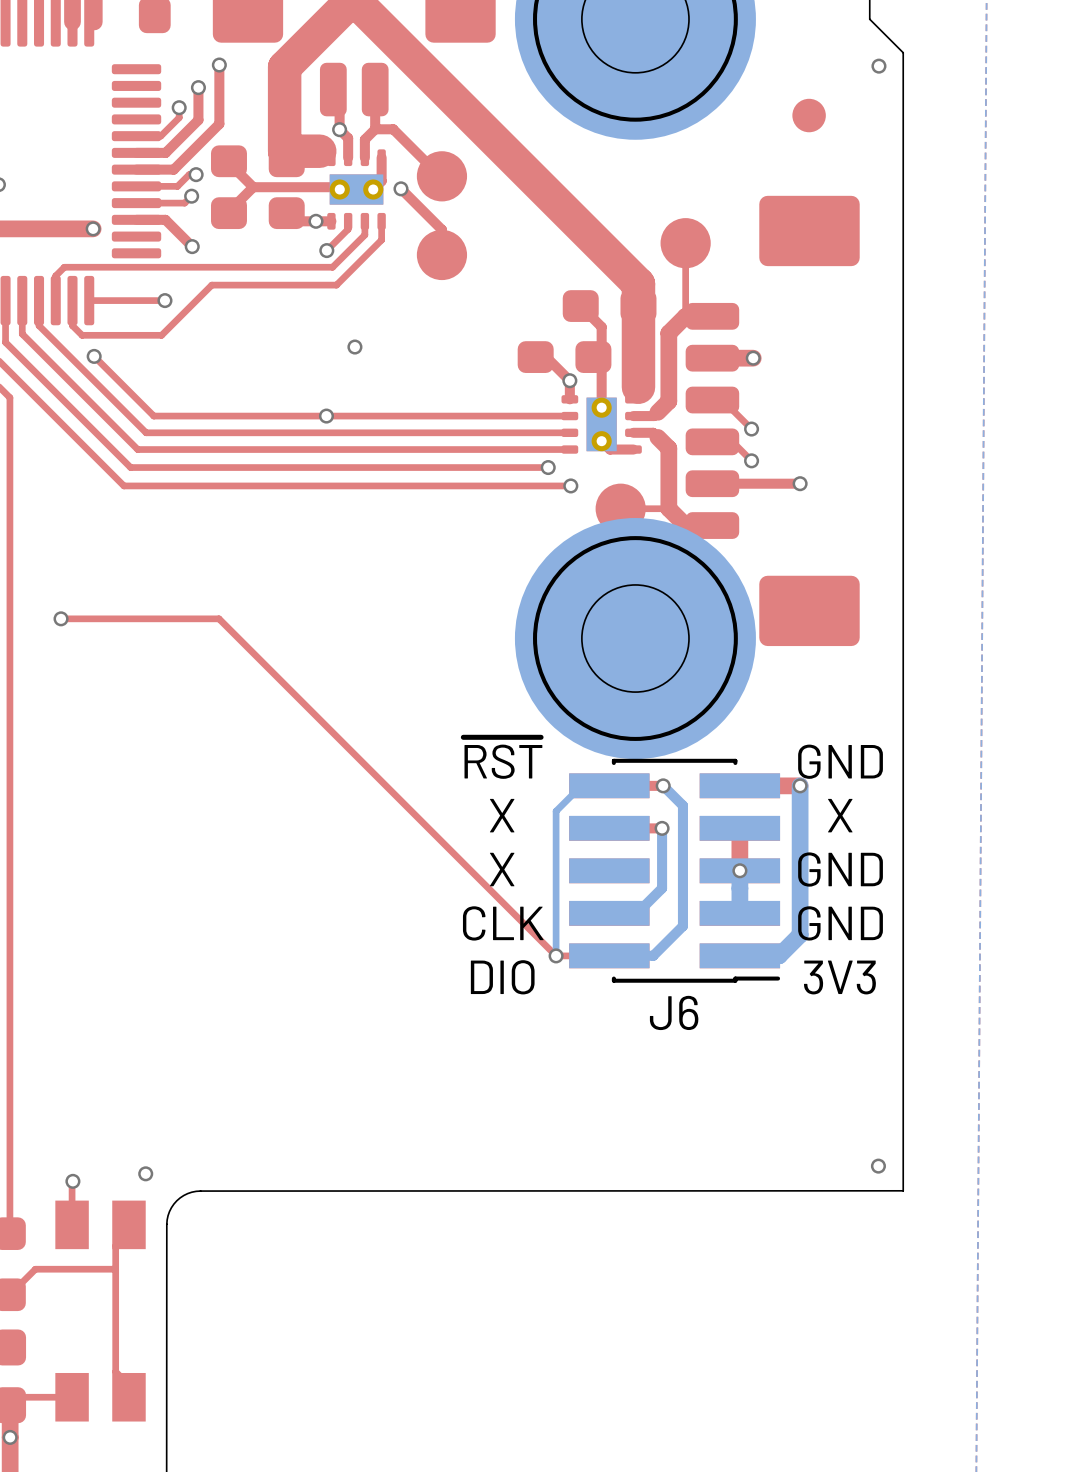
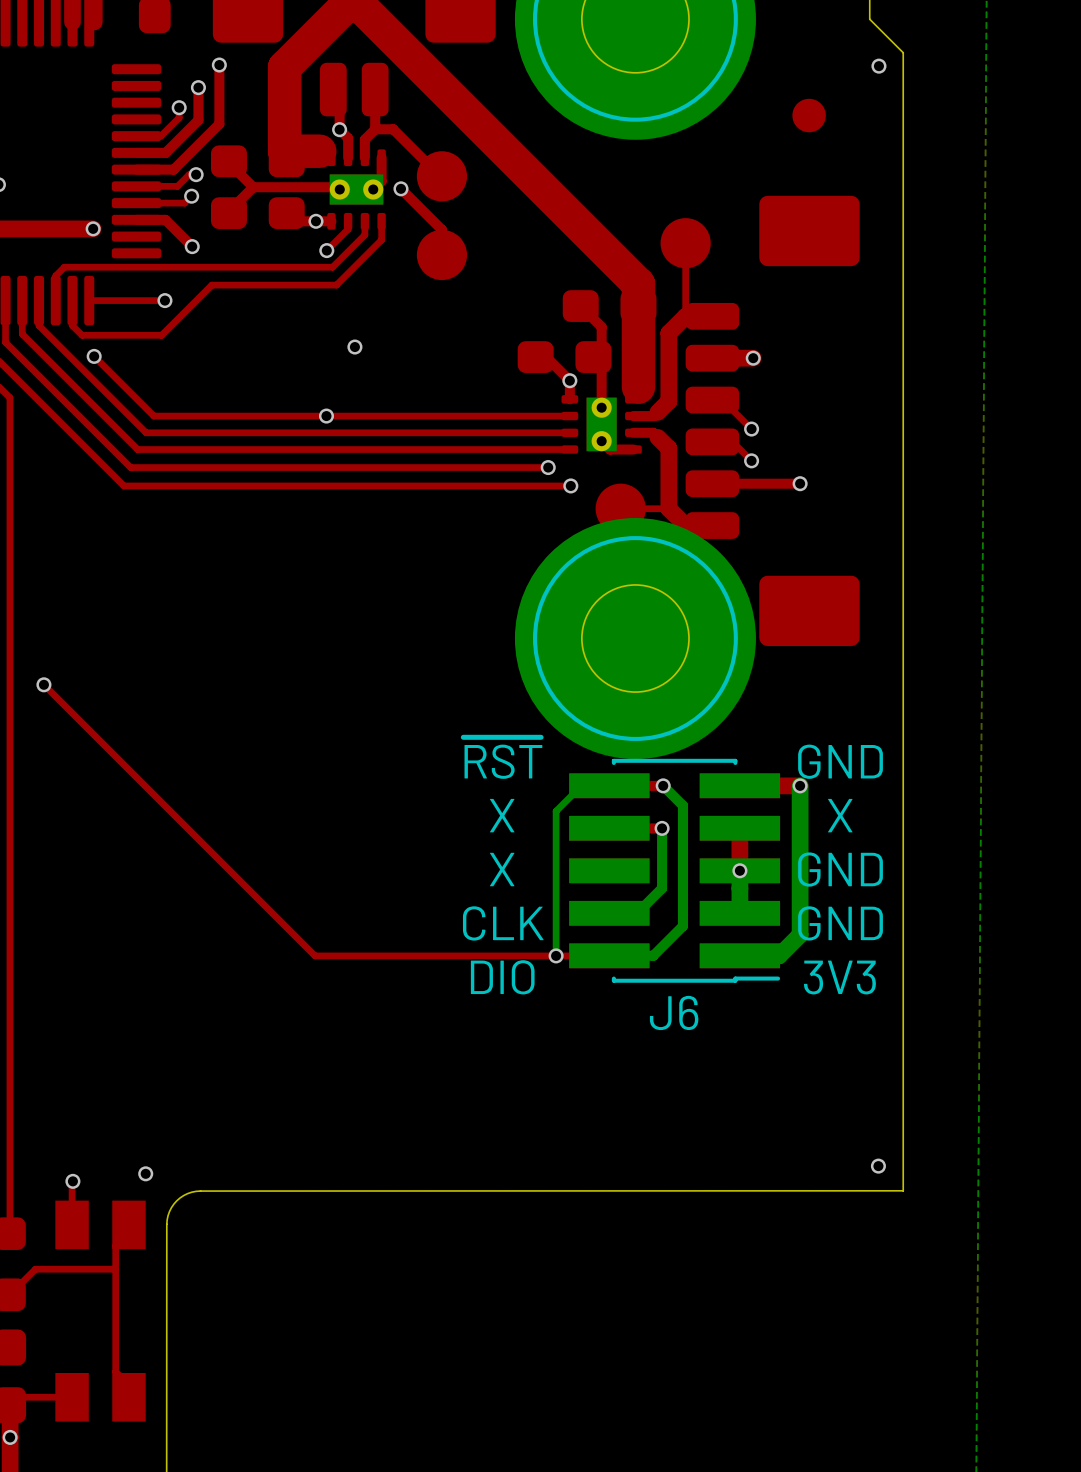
top track: (61, 618) (219, 618) (556, 955) -> (43, 684) (315, 955) (556, 955)
via: (61, 618) -> none
via: none -> (43, 684)

